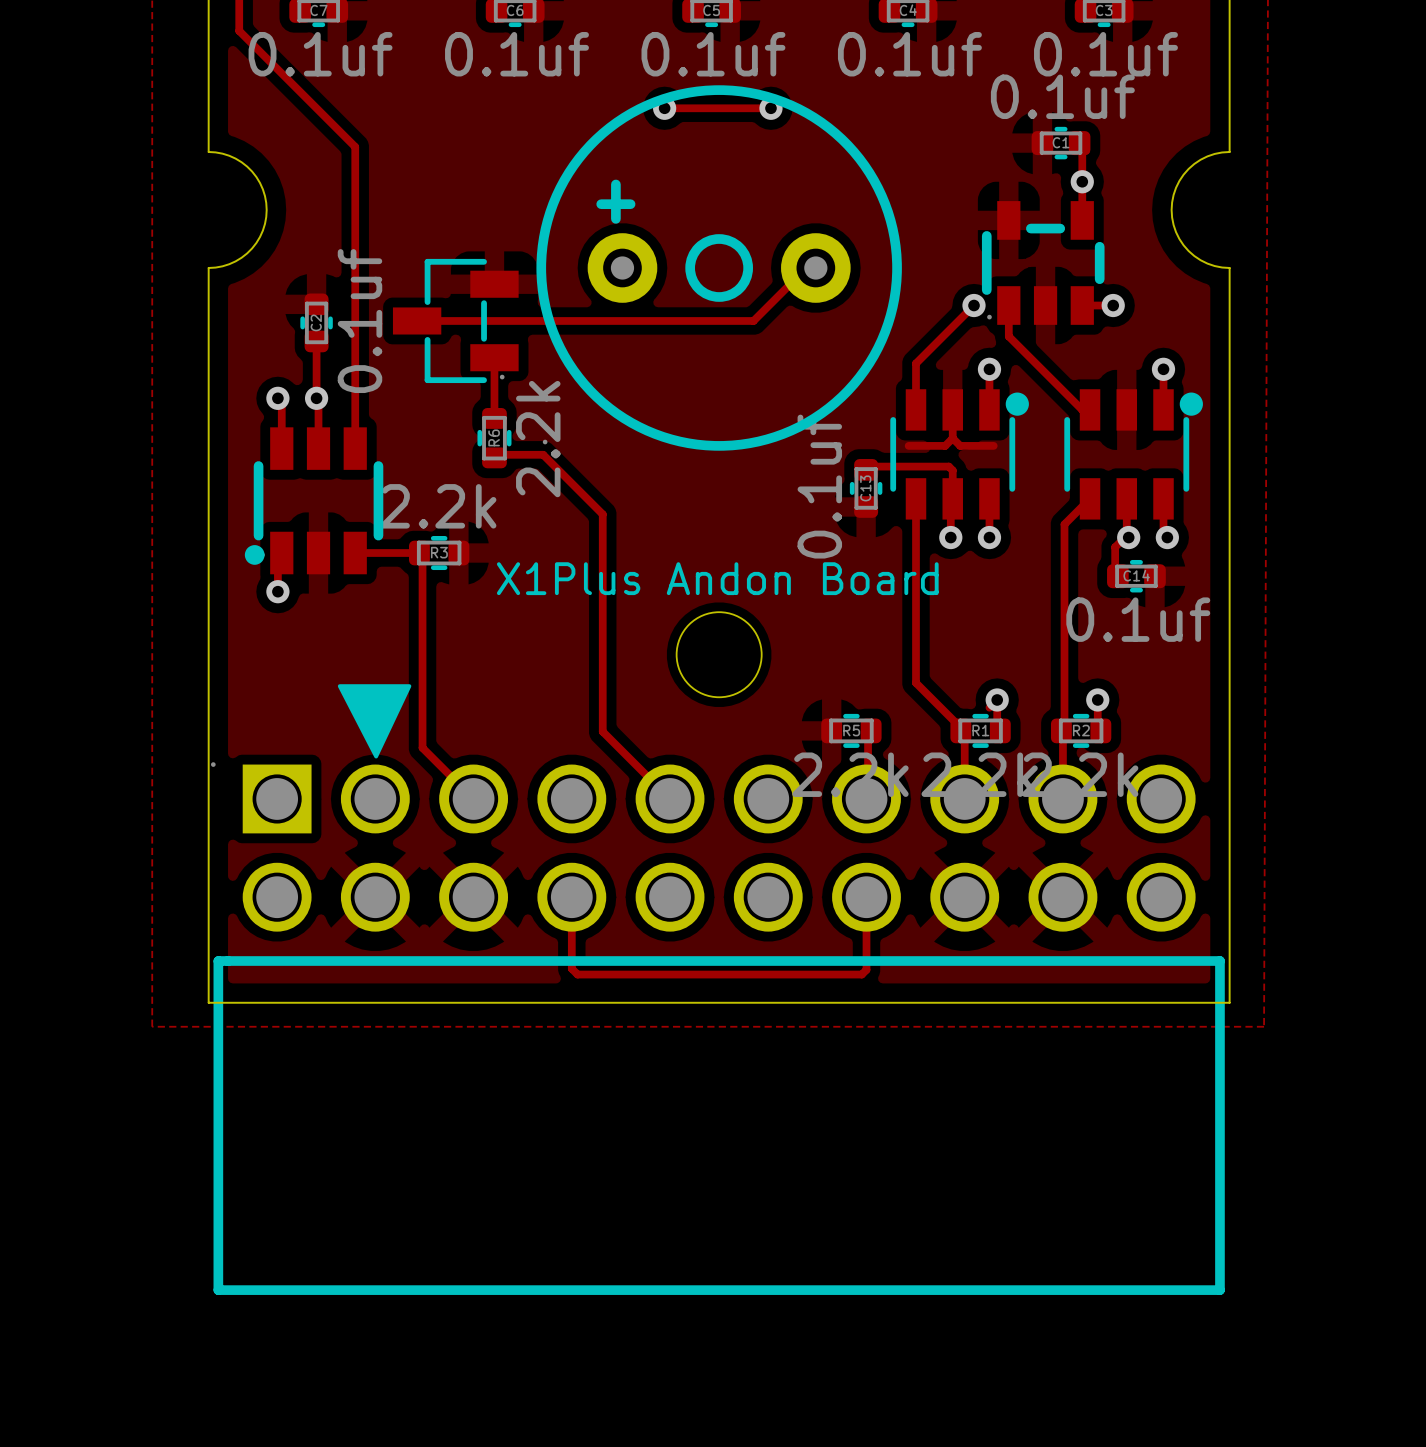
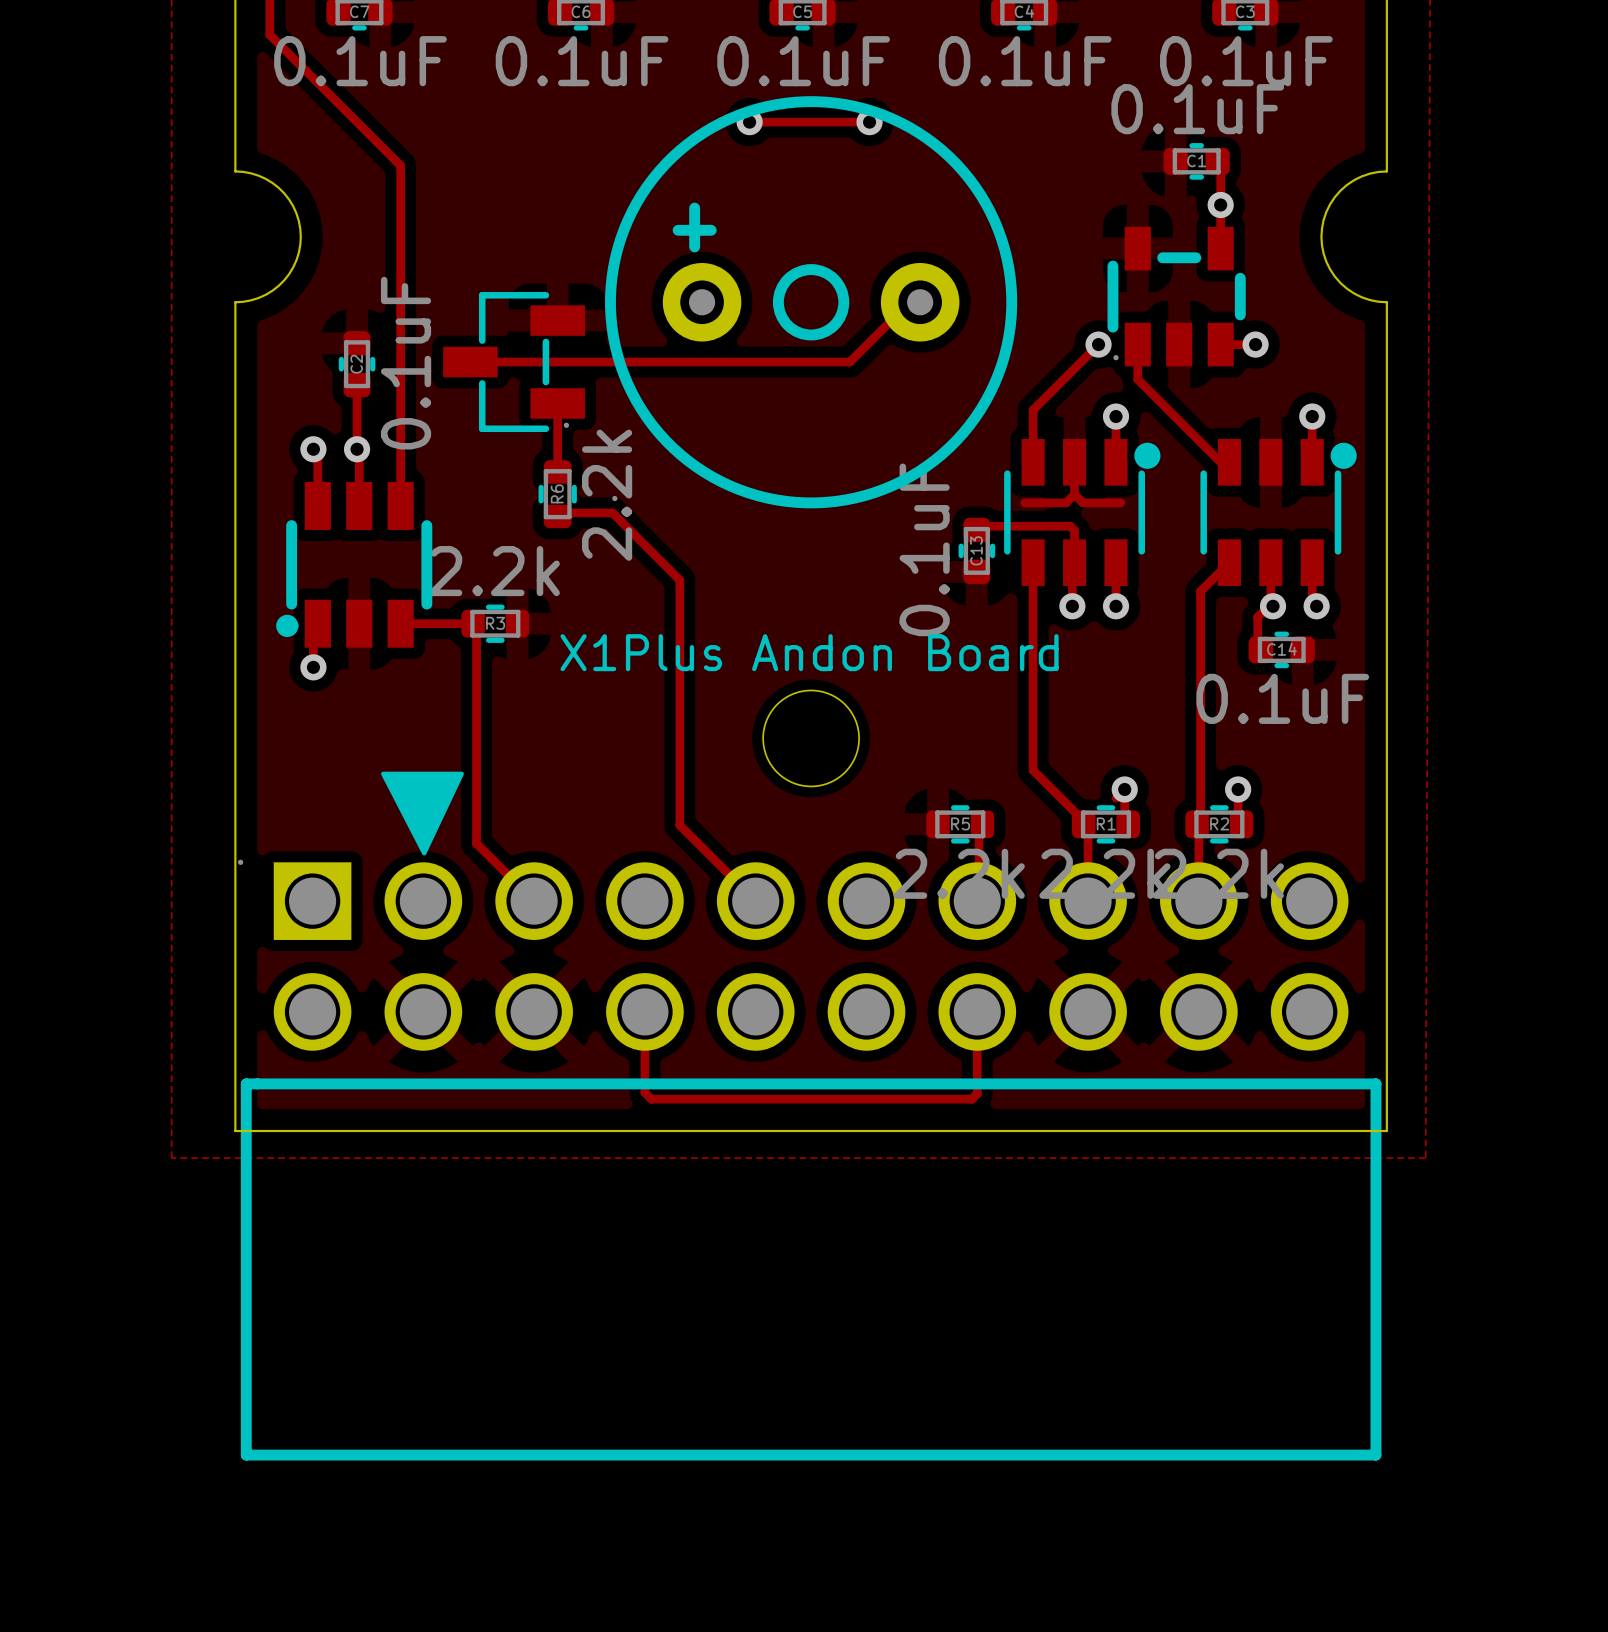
C7 value: 0.1uf (320, 54) -> 0.1uF (360, 61)
C6 value: 0.1uf (517, 54) -> 0.1uF (582, 61)
C5 value: 0.1uf (713, 54) -> 0.1uF (803, 61)
C4 value: 0.1uf (909, 54) -> 0.1uF (1025, 61)
C3 value: 0.1uf (1105, 54) -> 0.1uF (1246, 61)
C1 value: 0.1uf (1062, 96) -> 0.1uF (1197, 109)
C2 value: 0.1uf (359, 321) -> 0.1uF (406, 363)
C13 value: 0.1uf (819, 486) -> 0.1uF (924, 549)
C14 value: 0.1uf (1138, 619) -> 0.1uF (1282, 698)

